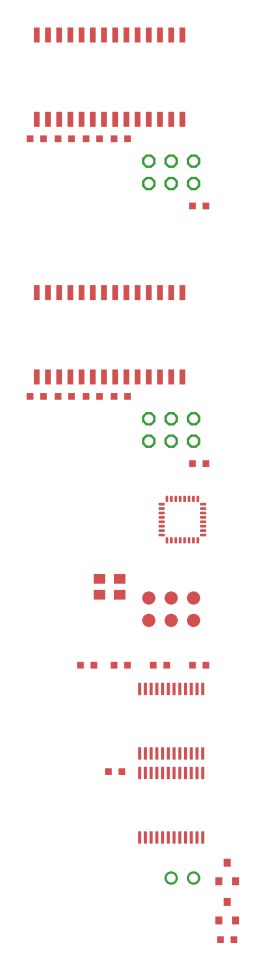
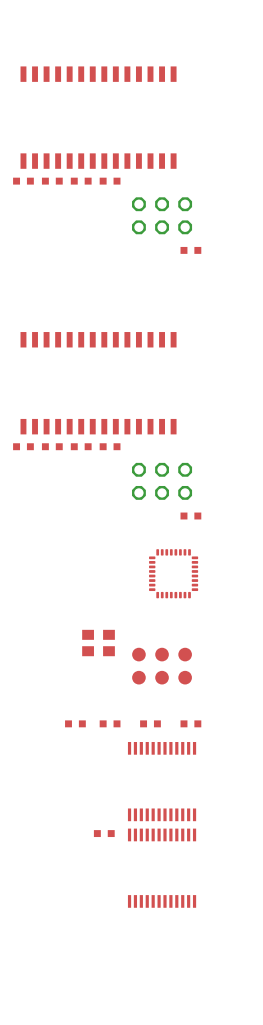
part: (227, 871) -> none
part: (182, 878) -> none
part: (227, 911) -> none
part: (227, 939) -> none

